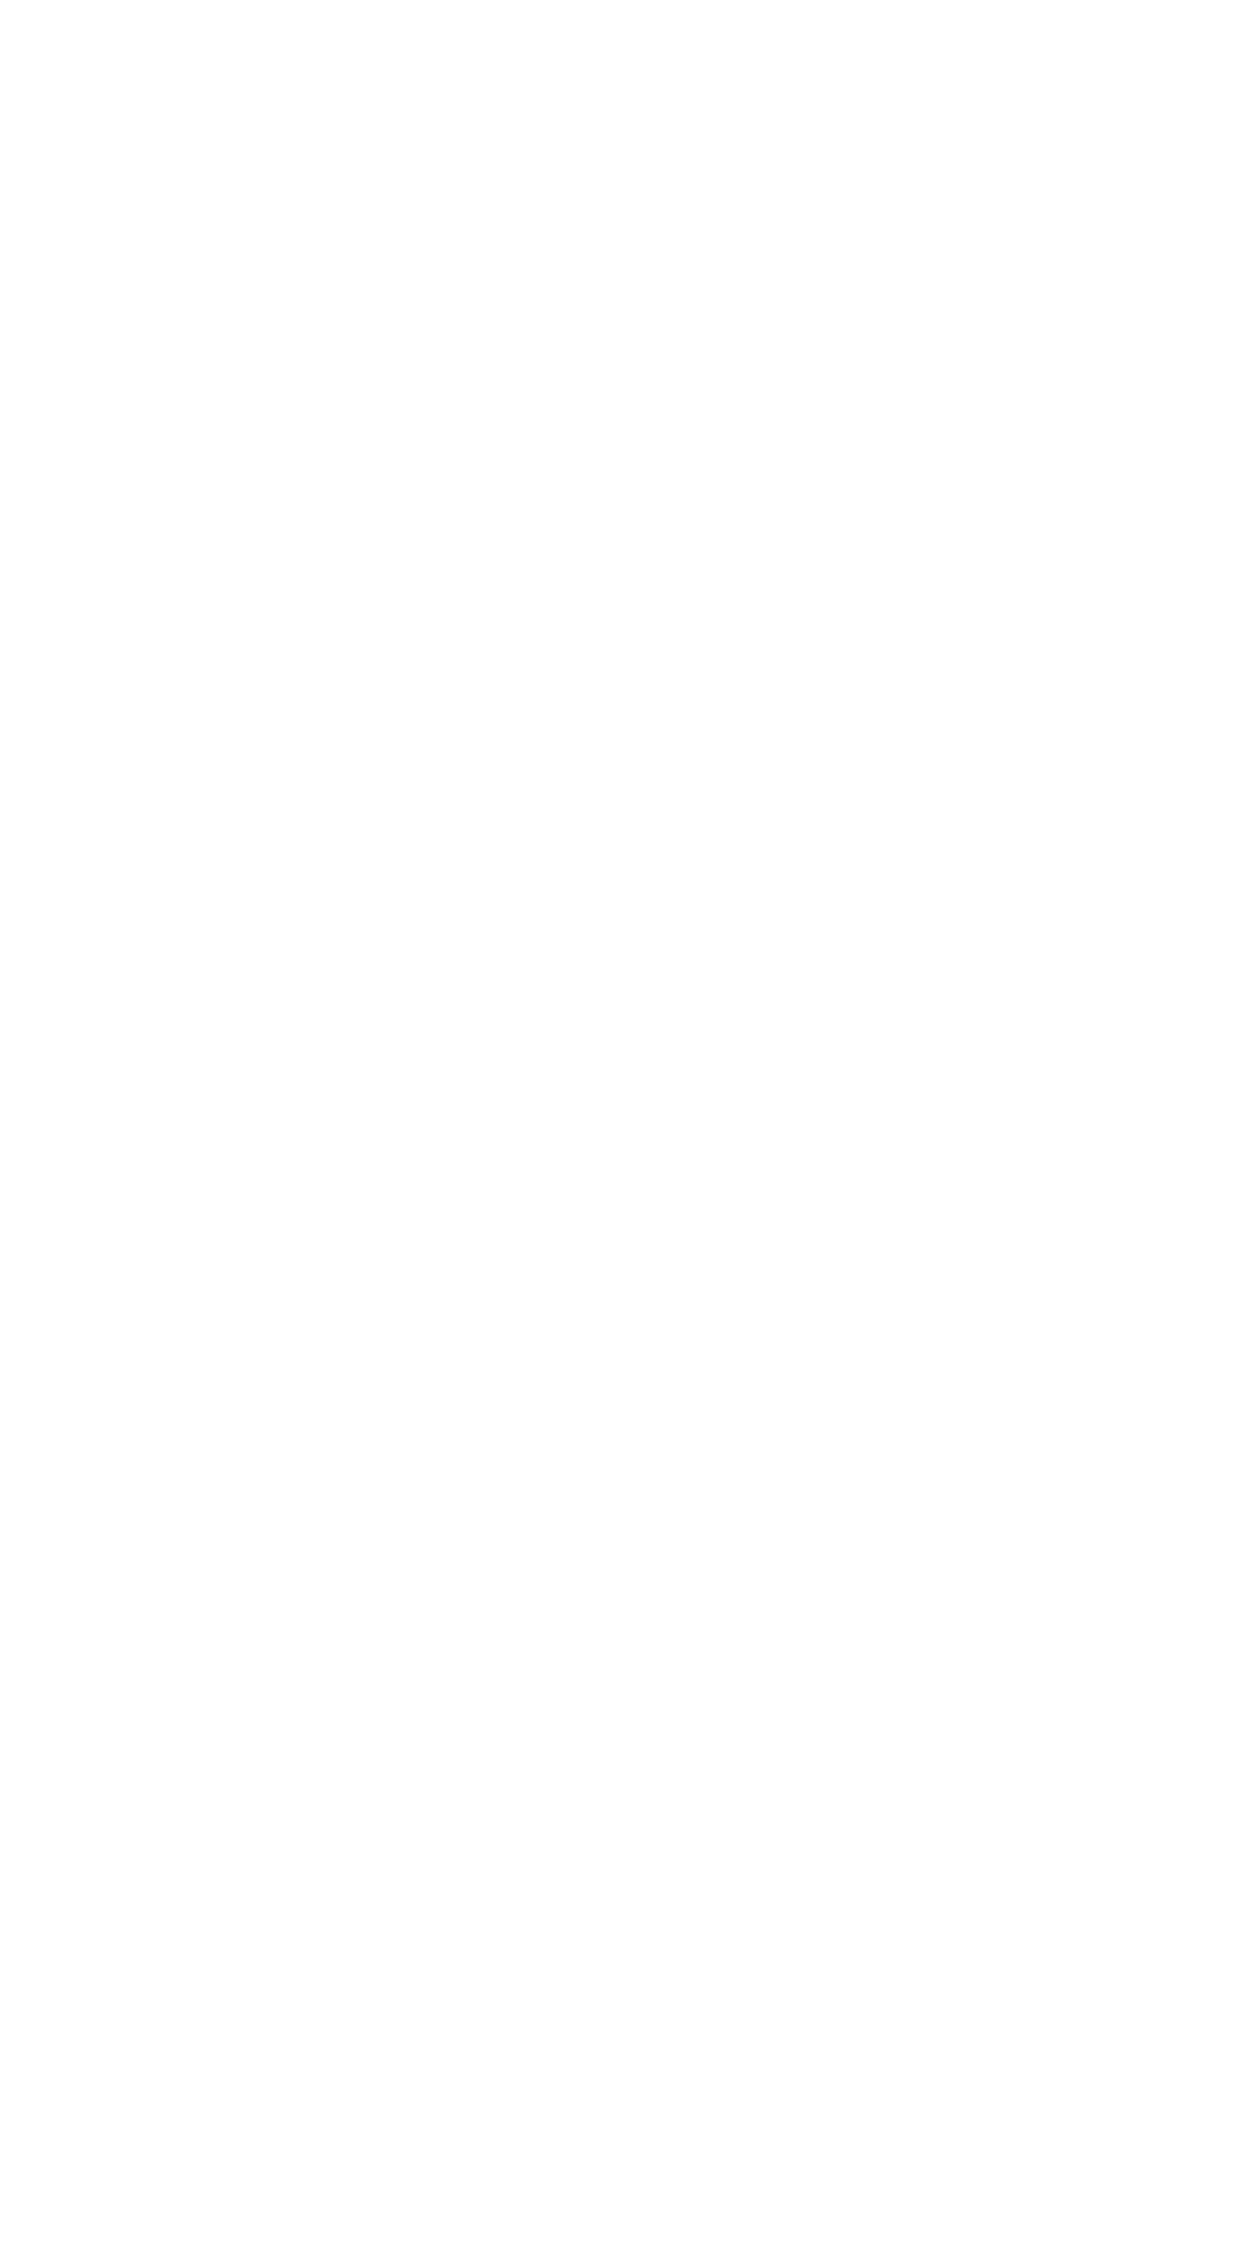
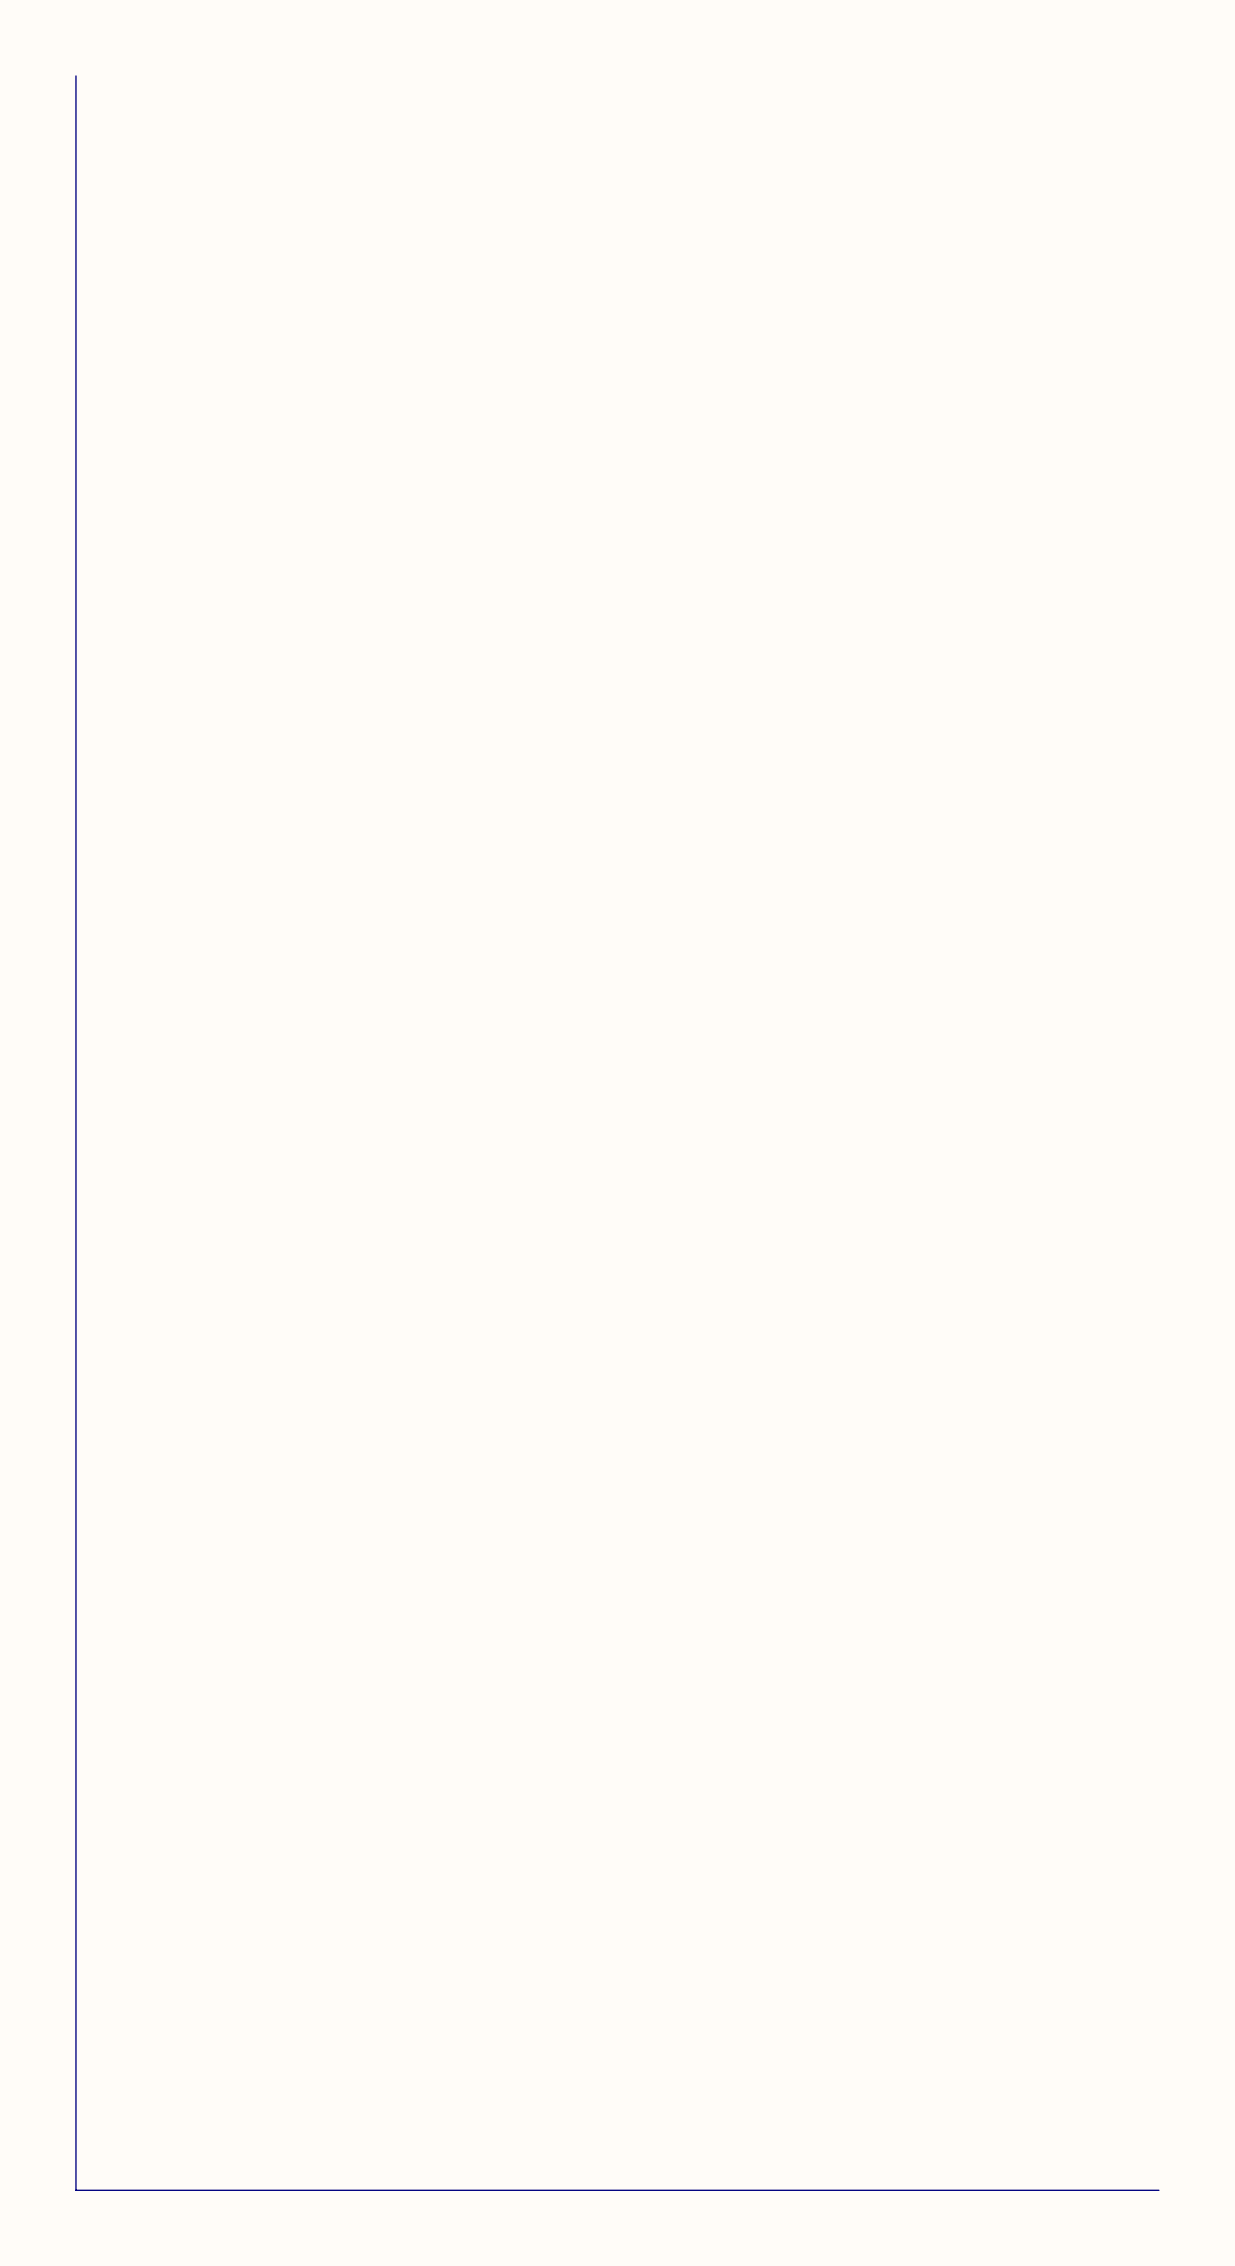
wire: none -> (75, 75) (75, 2190) (1158, 2190)

